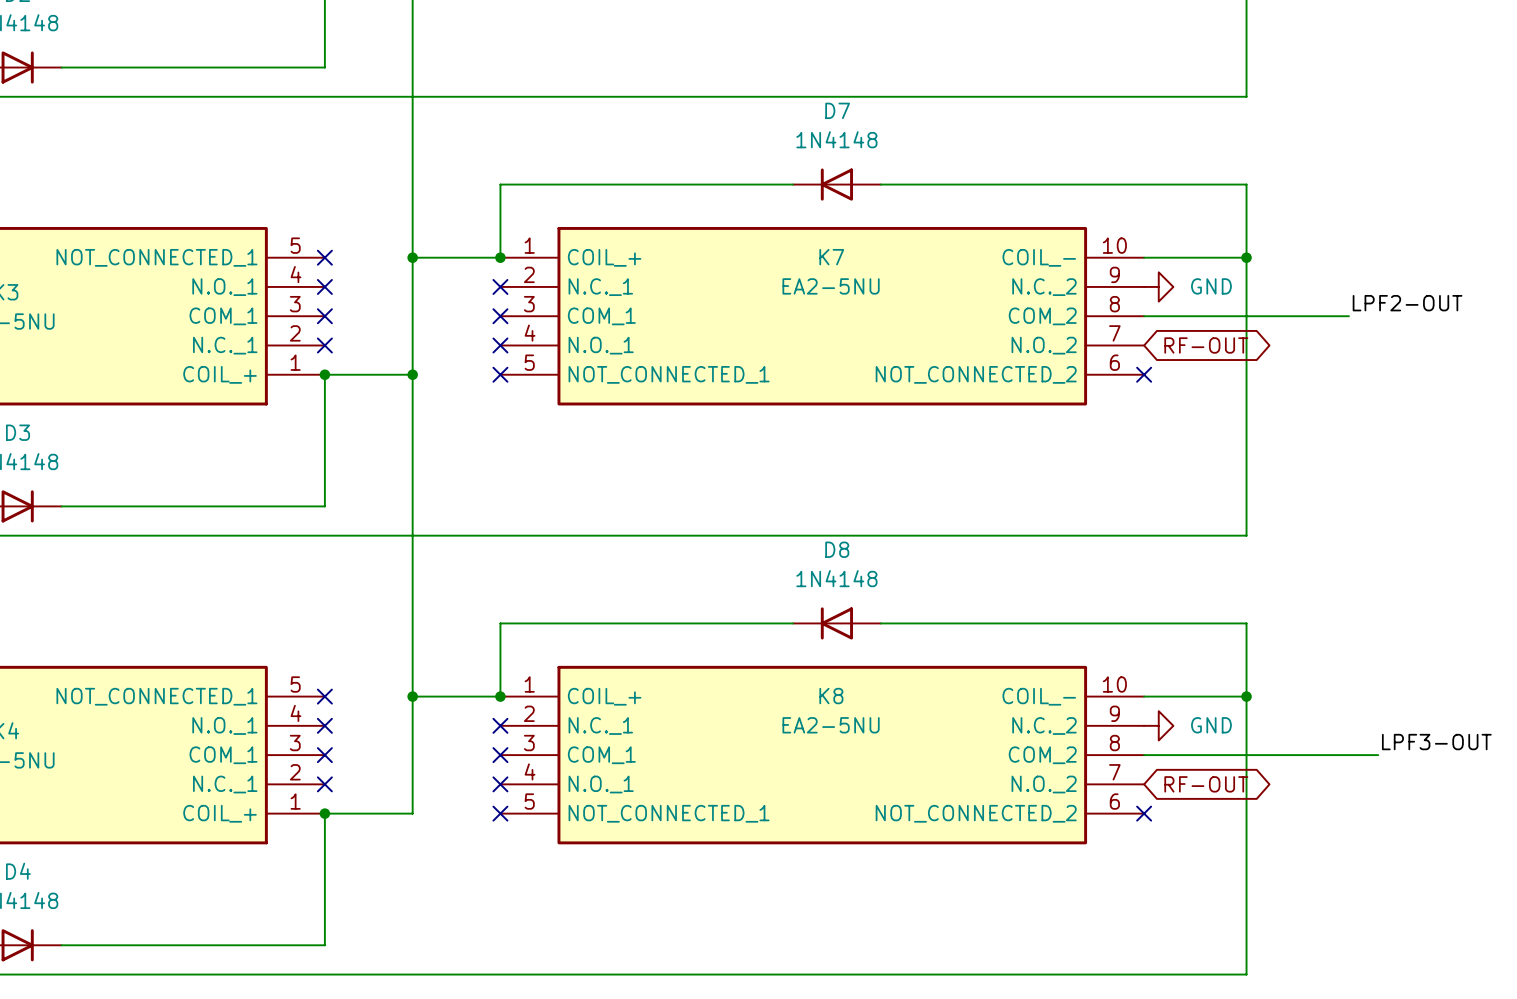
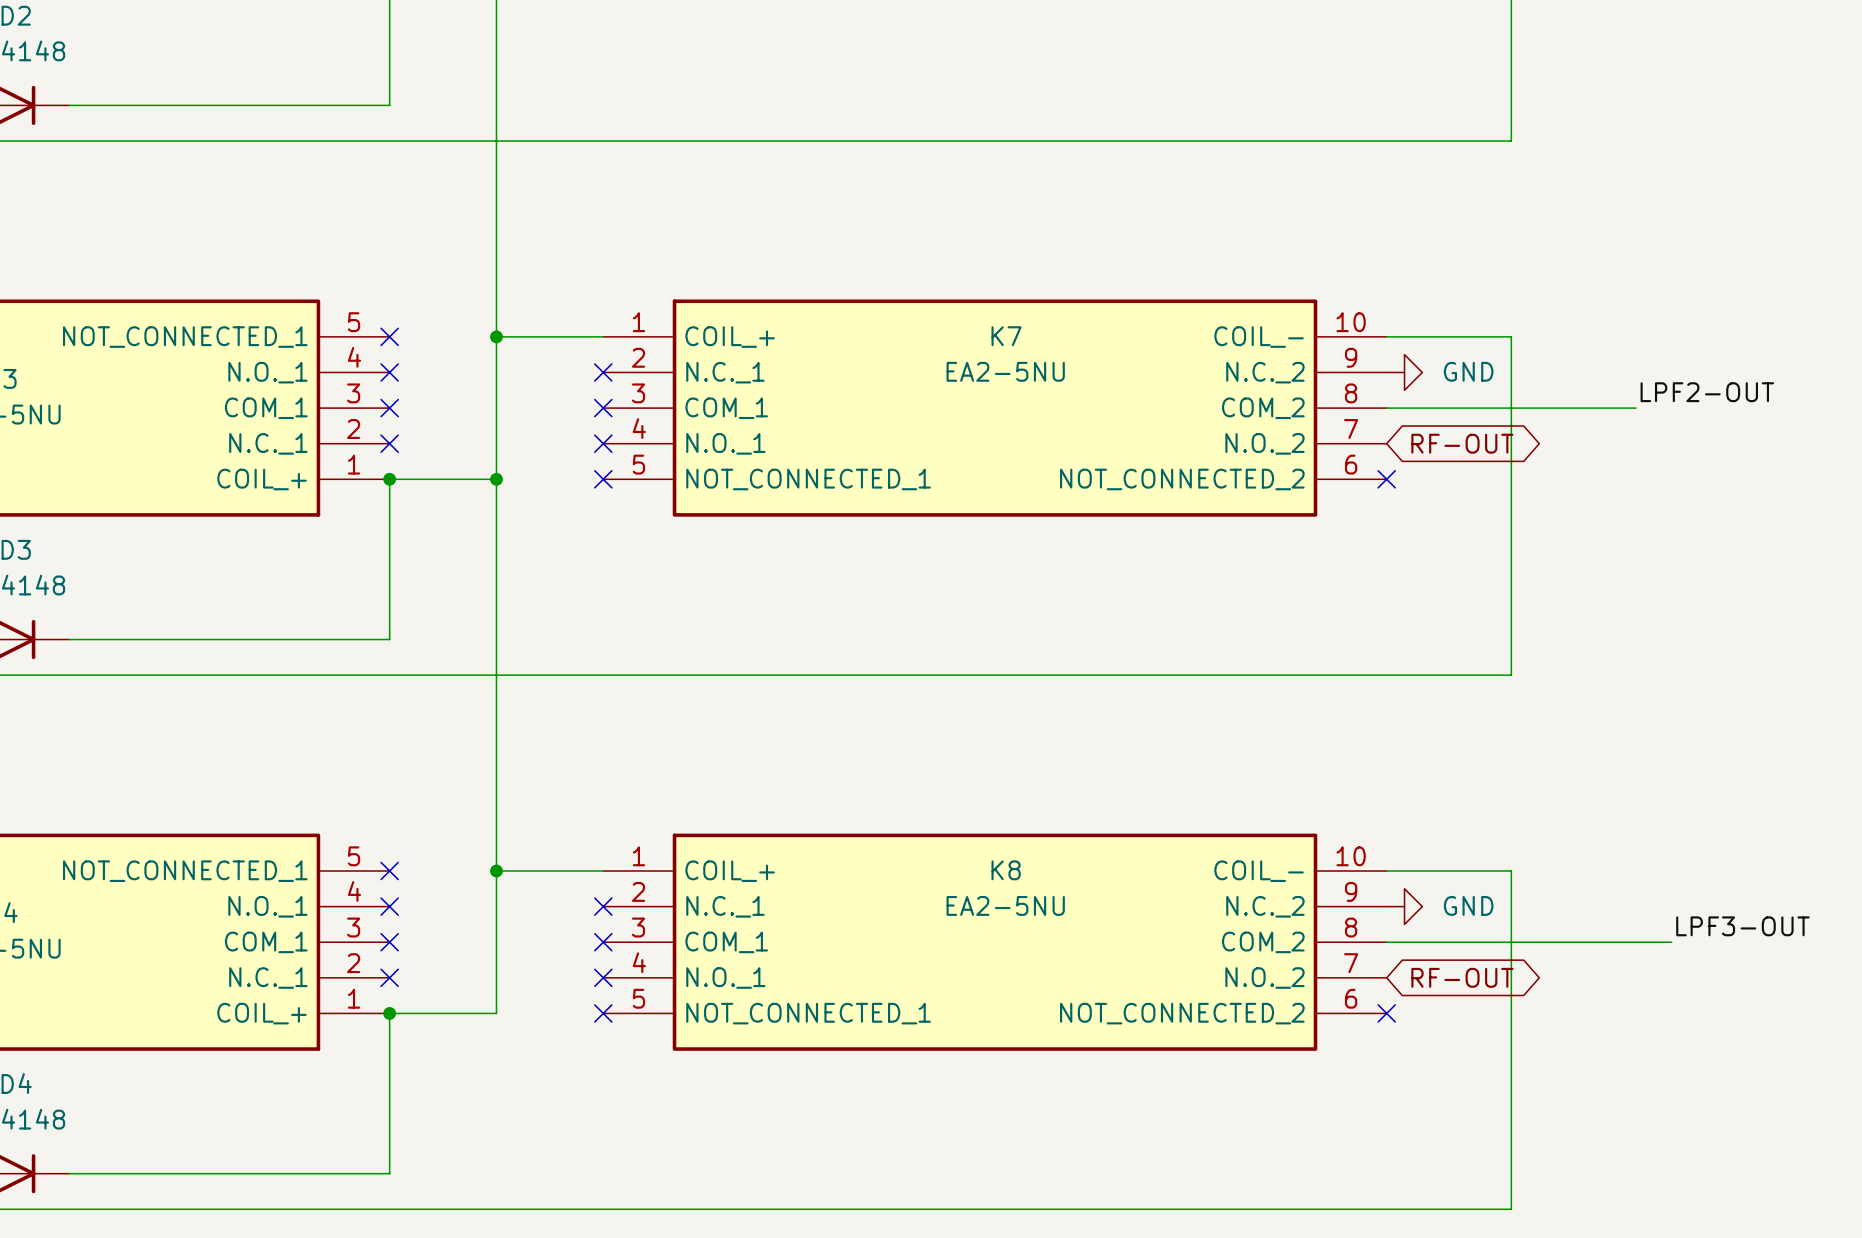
wire: (793, 184) (500, 184) (500, 257) -> none
D7: 1N4148 (836, 184) -> none
wire: (880, 184) (1246, 184) (1246, 257) -> none
junction: (500, 257) -> none
junction: (1246, 257) -> none
wire: (793, 623) (500, 623) (500, 696) -> none
D8: 1N4148 (836, 623) -> none
wire: (880, 623) (1246, 623) (1246, 696) -> none
junction: (500, 696) -> none
junction: (1246, 696) -> none

